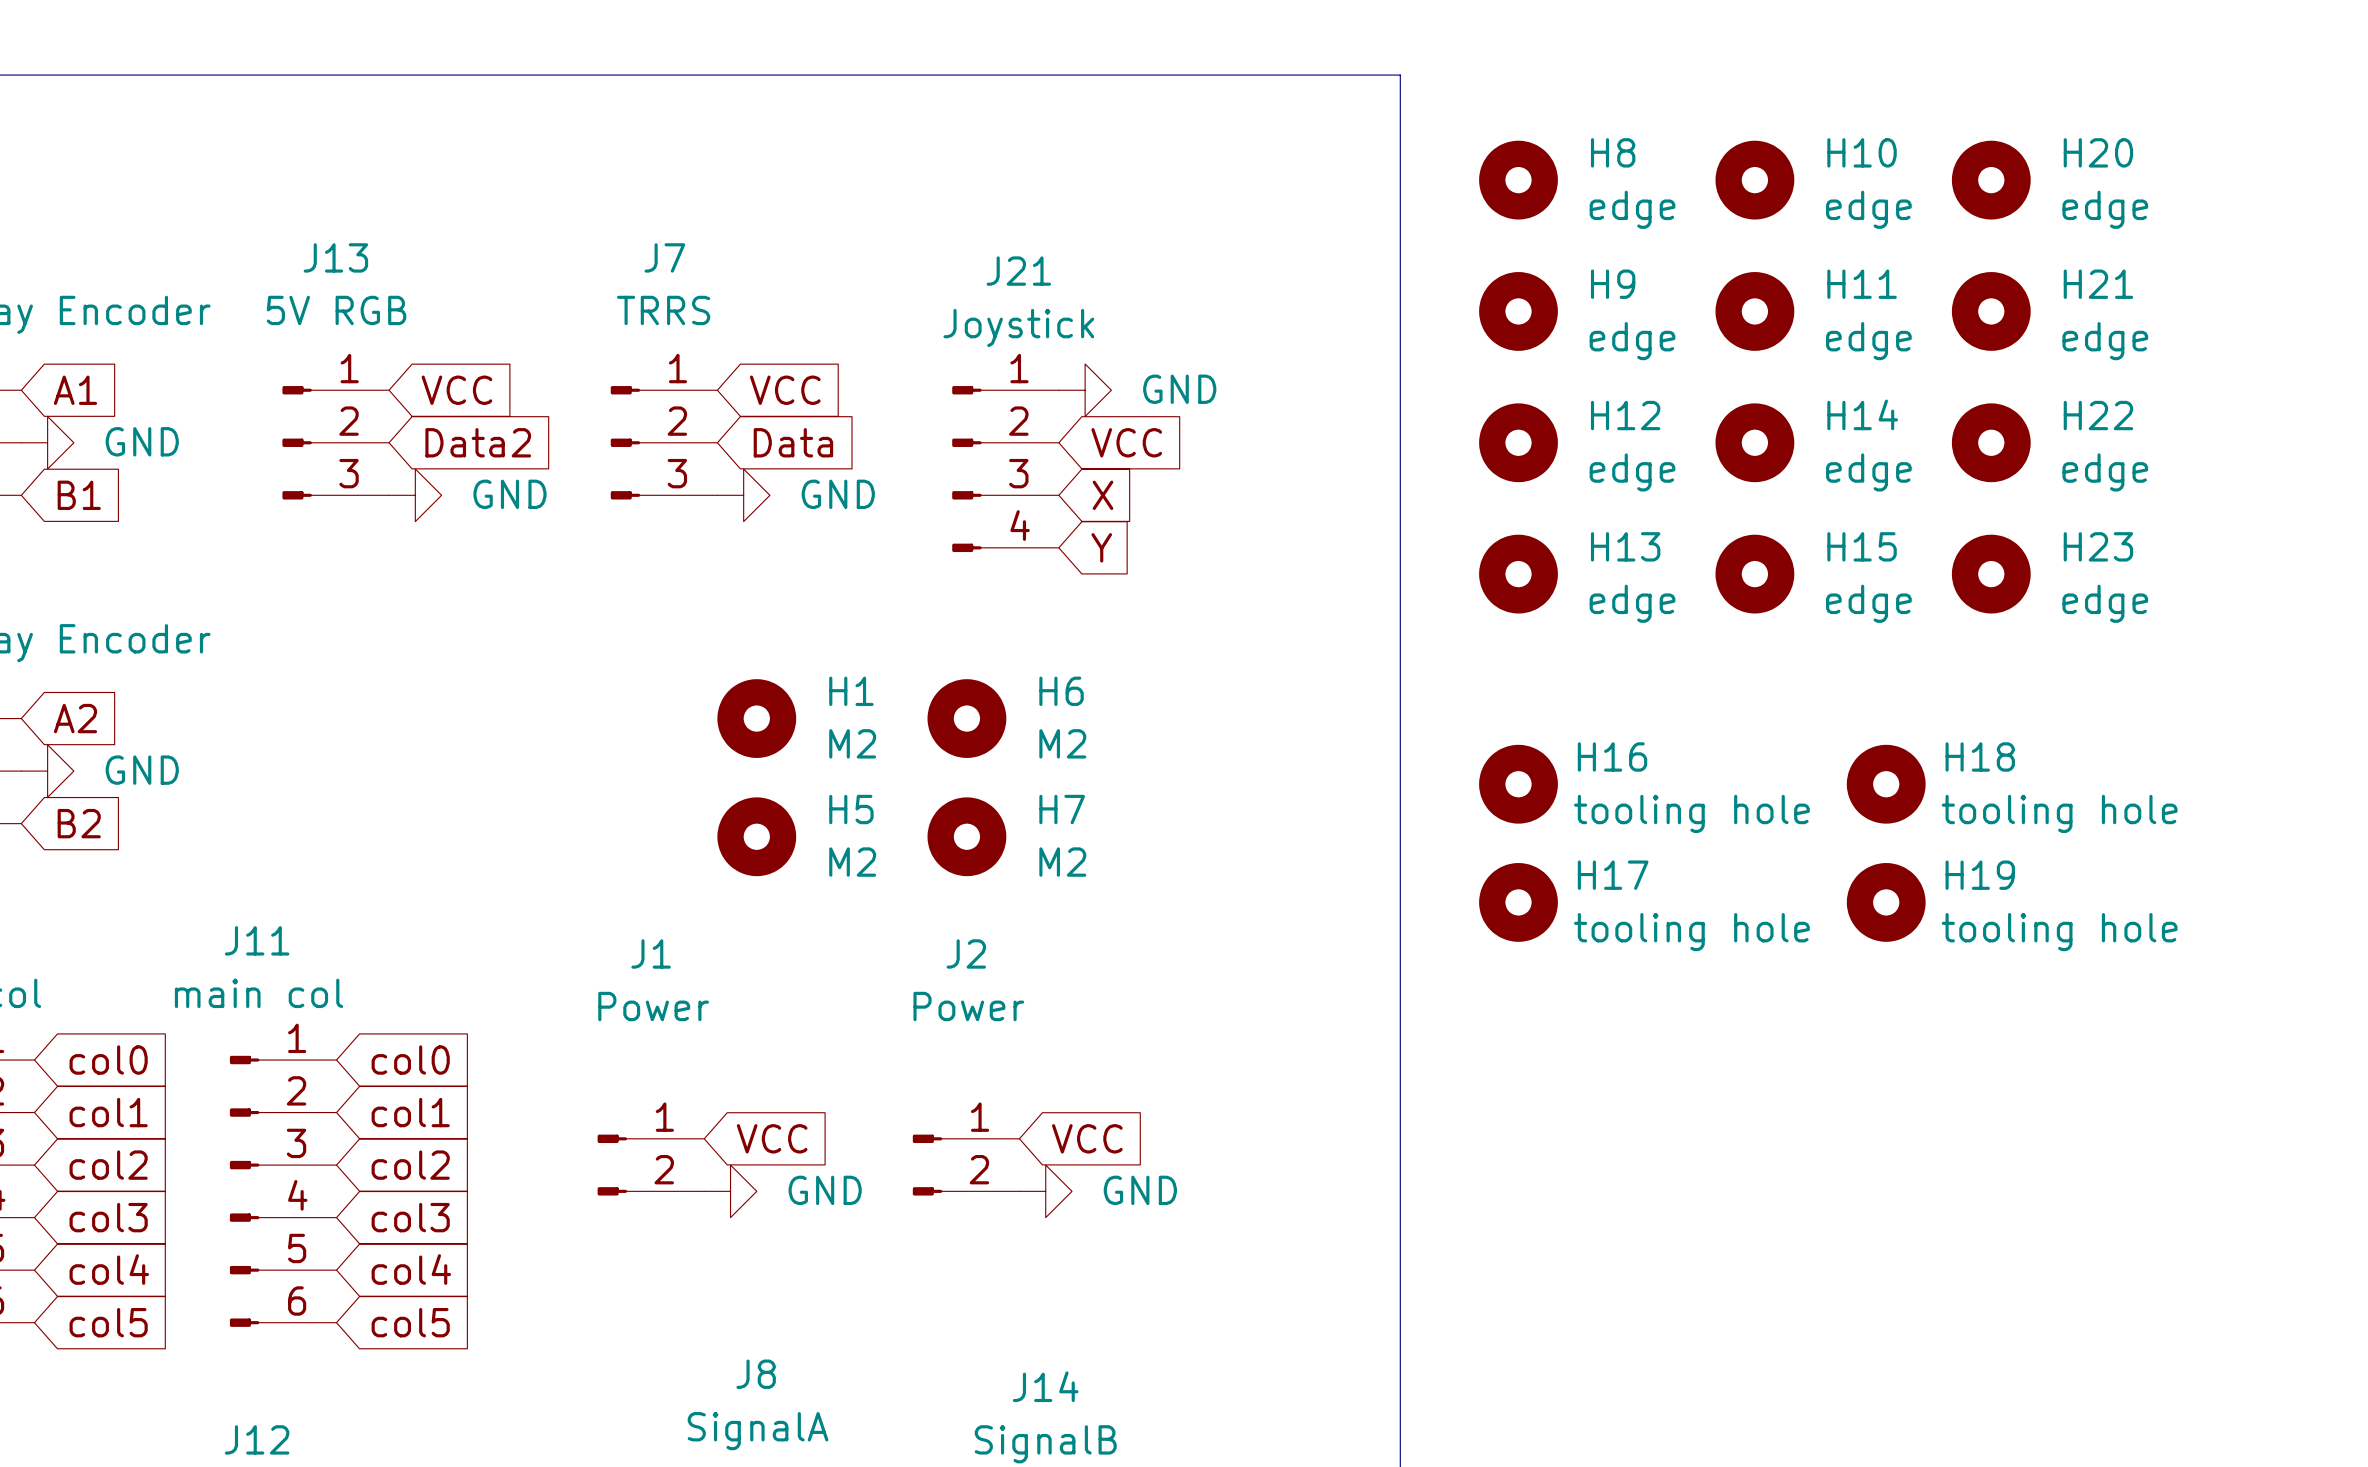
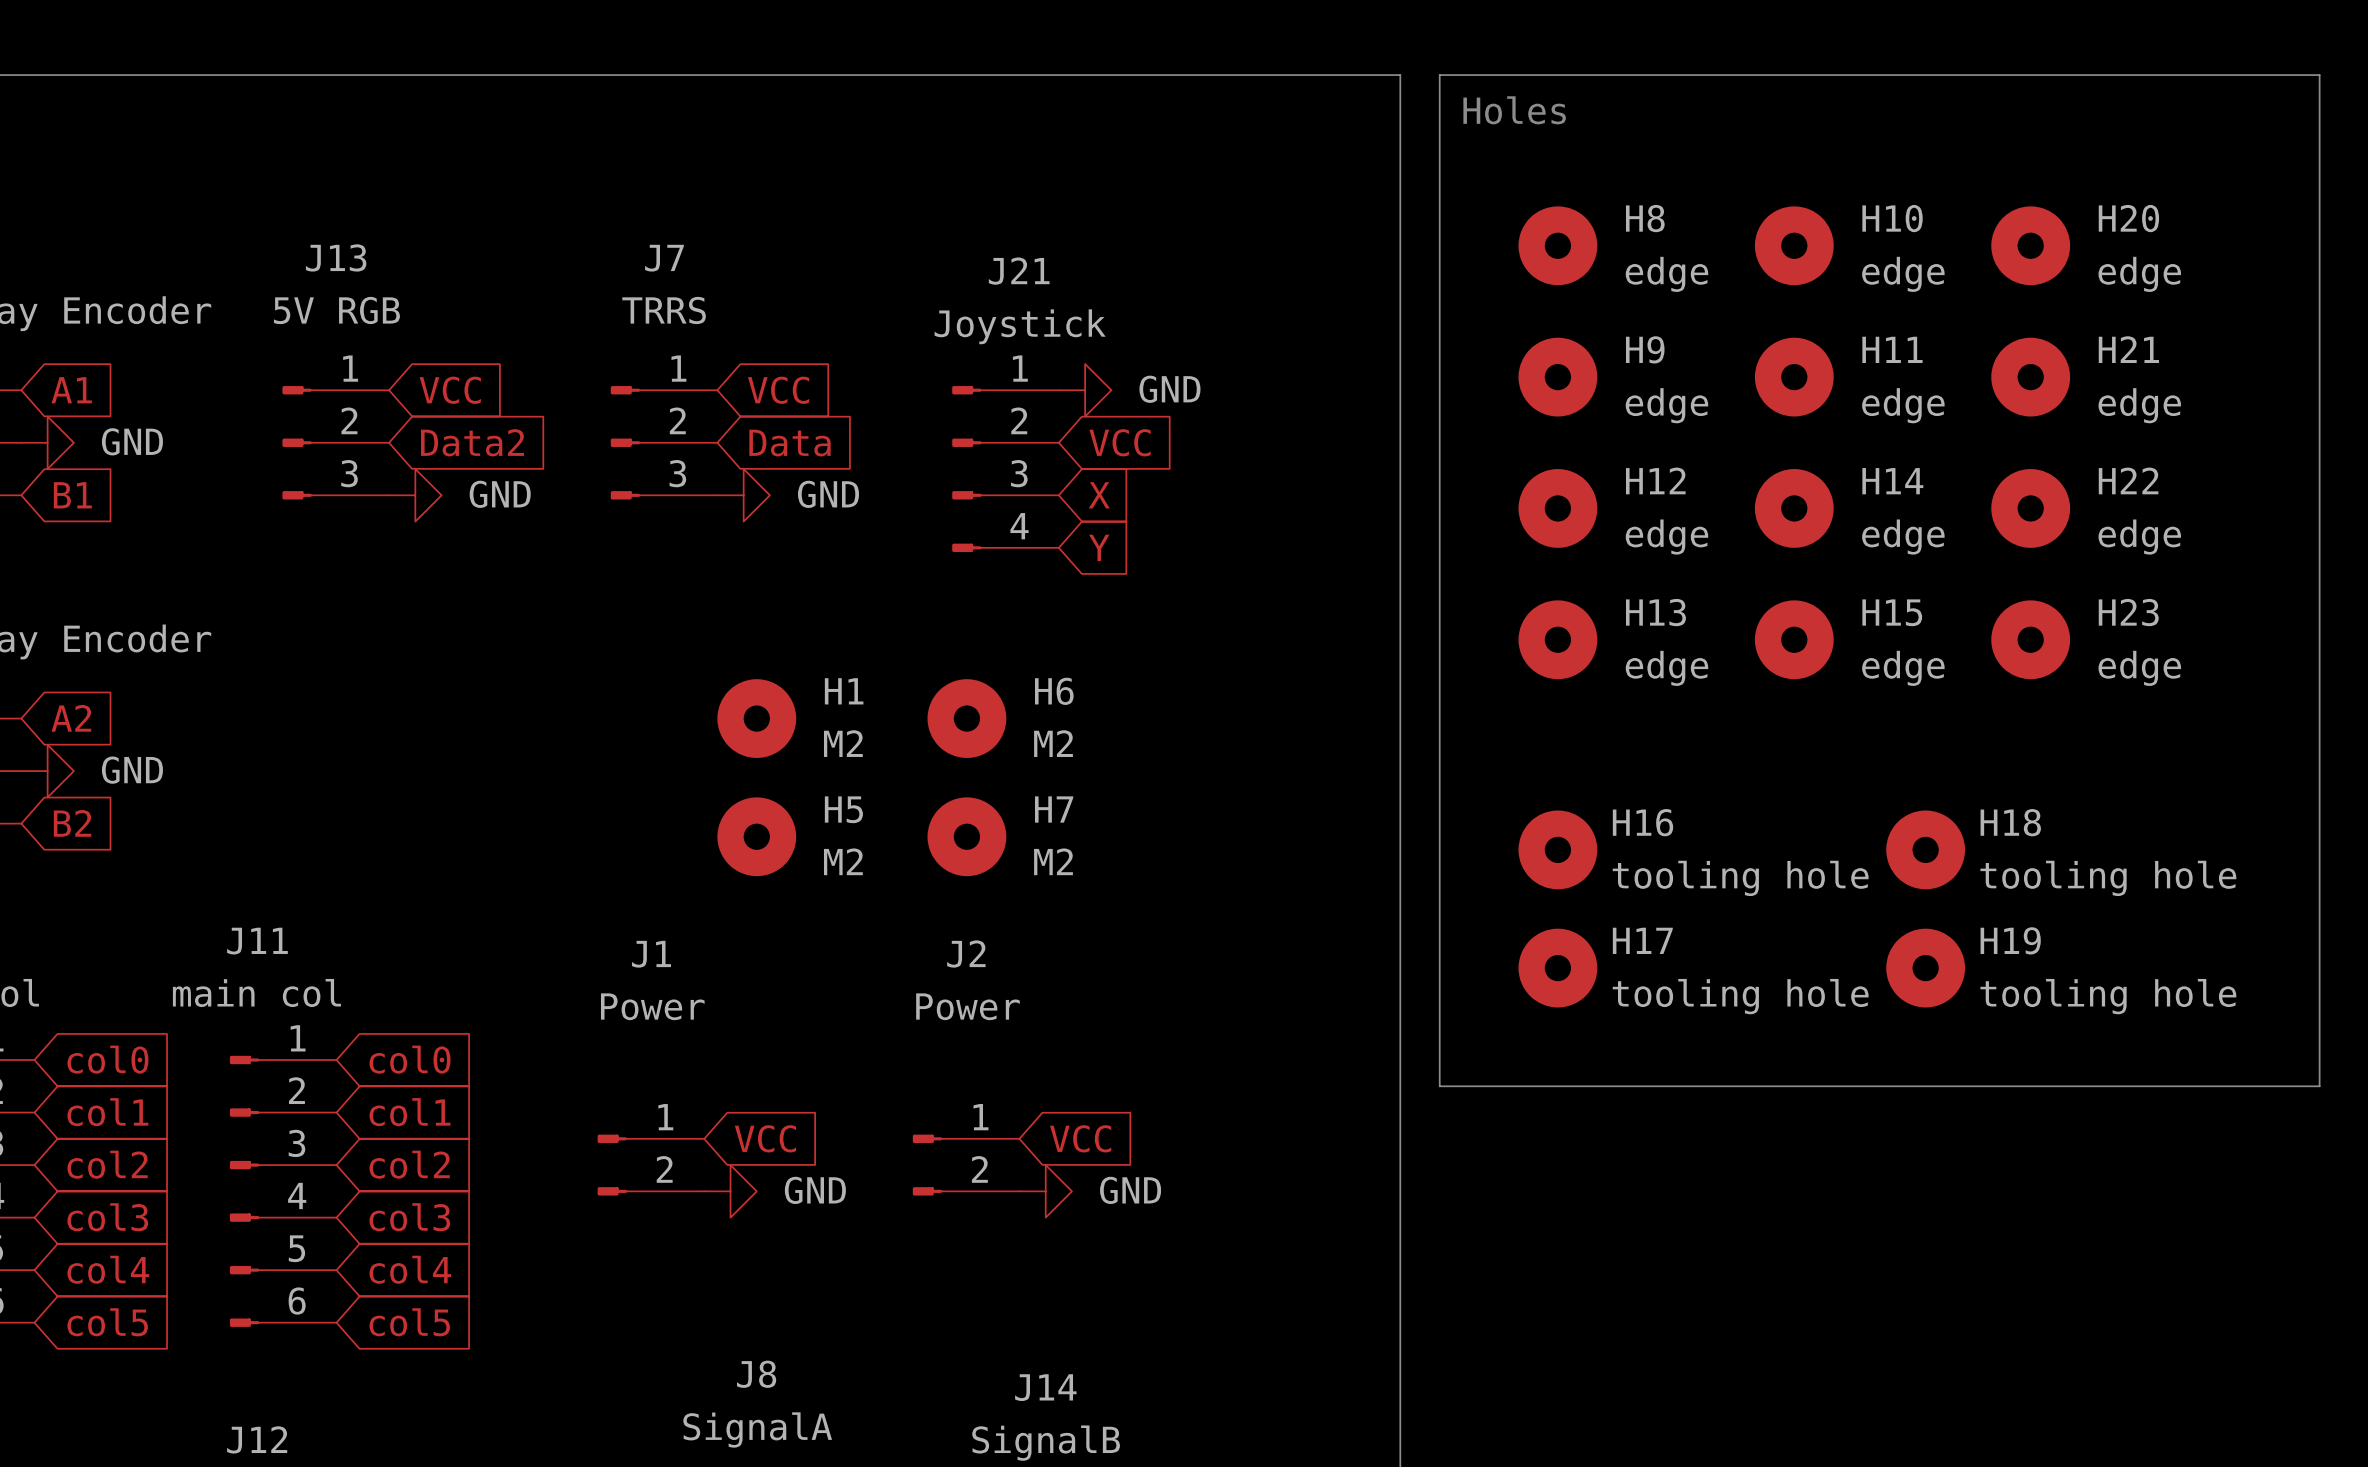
line: none -> (1439, 75) (2319, 75) (2319, 1086) (1439, 1086) (1439, 75)
text: none -> Holes (1514, 110)
H8 position: (1518, 180) -> (1557, 245)
H10 position: (1754, 180) -> (1794, 245)
H20 position: (1991, 180) -> (2030, 245)
H9 position: (1518, 311) -> (1557, 377)
H11 position: (1754, 311) -> (1794, 377)
H21 position: (1991, 311) -> (2030, 377)
H12 position: (1518, 442) -> (1557, 508)
H14 position: (1754, 442) -> (1794, 508)
H22 position: (1991, 442) -> (2030, 508)
H13 position: (1518, 574) -> (1557, 639)
H15 position: (1754, 574) -> (1794, 639)
H23 position: (1991, 574) -> (2030, 639)
H16 position: (1518, 784) -> (1557, 849)
H18 position: (1886, 784) -> (1925, 849)
H17 position: (1518, 902) -> (1557, 968)
H19 position: (1886, 902) -> (1925, 968)

